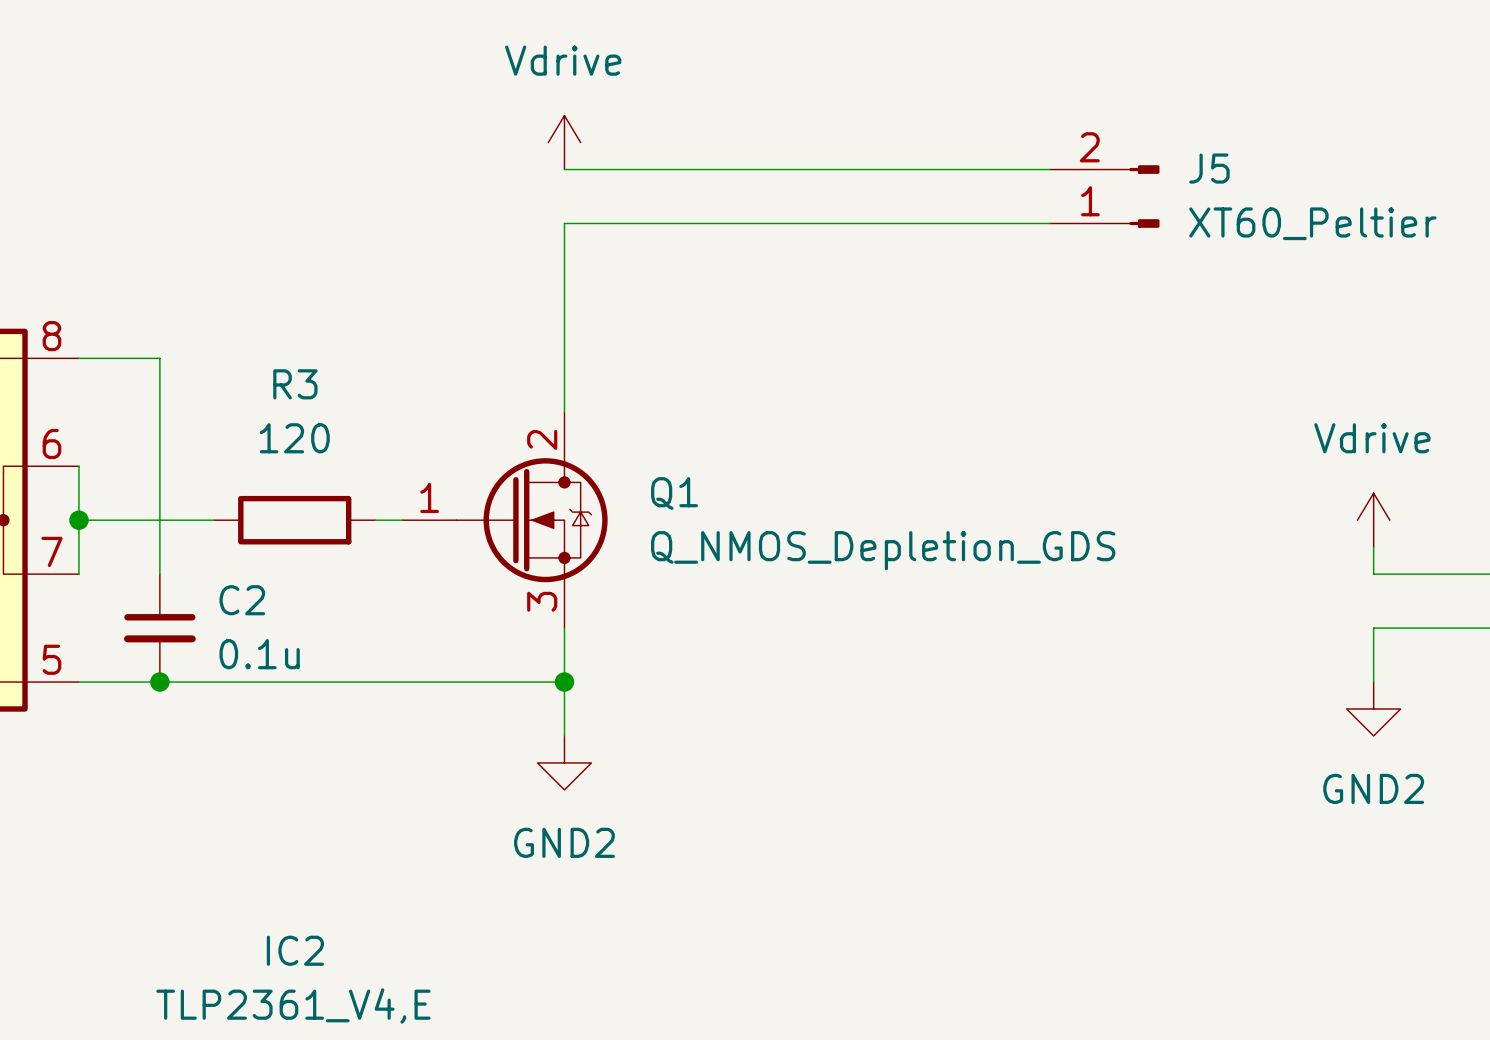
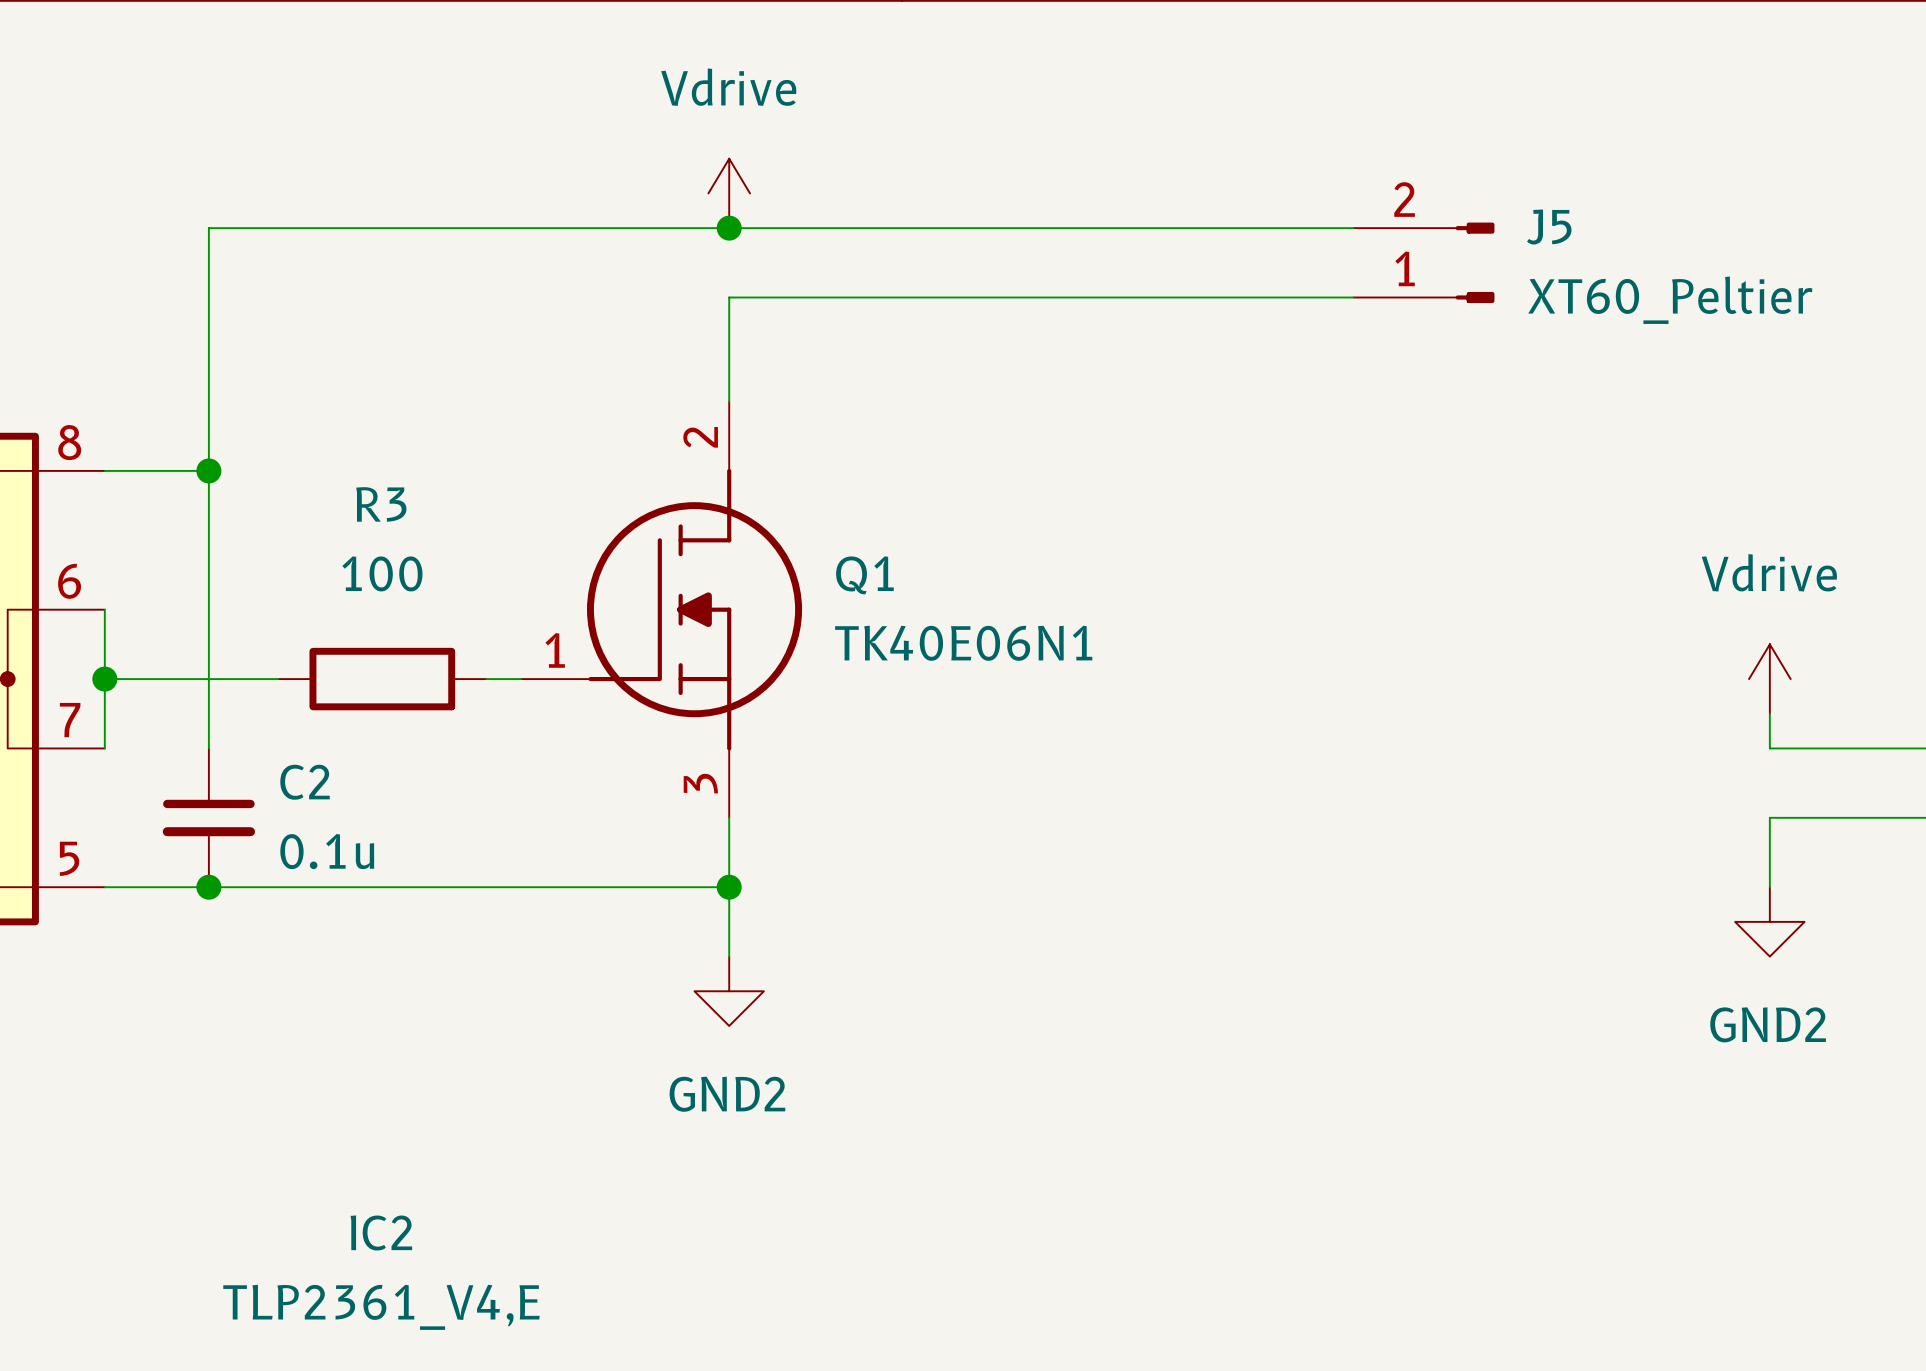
wire: none -> (729, 228) (208, 228) (208, 470)
junction: none -> (729, 228)
junction: none -> (208, 470)
Q1 symbol: [402, 412, 608, 629] -> [521, 401, 803, 818]
R3 value: 120 (294, 438) -> 100 (382, 573)
Q1 value: Q_NMOS_Depletion_GDS (883, 550) -> TK40E06N1 (963, 643)

